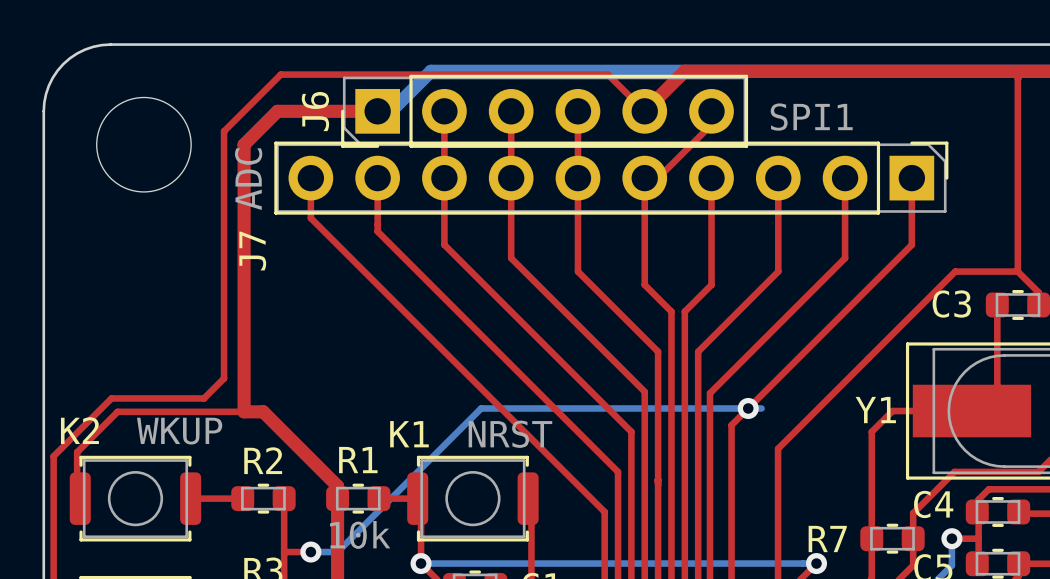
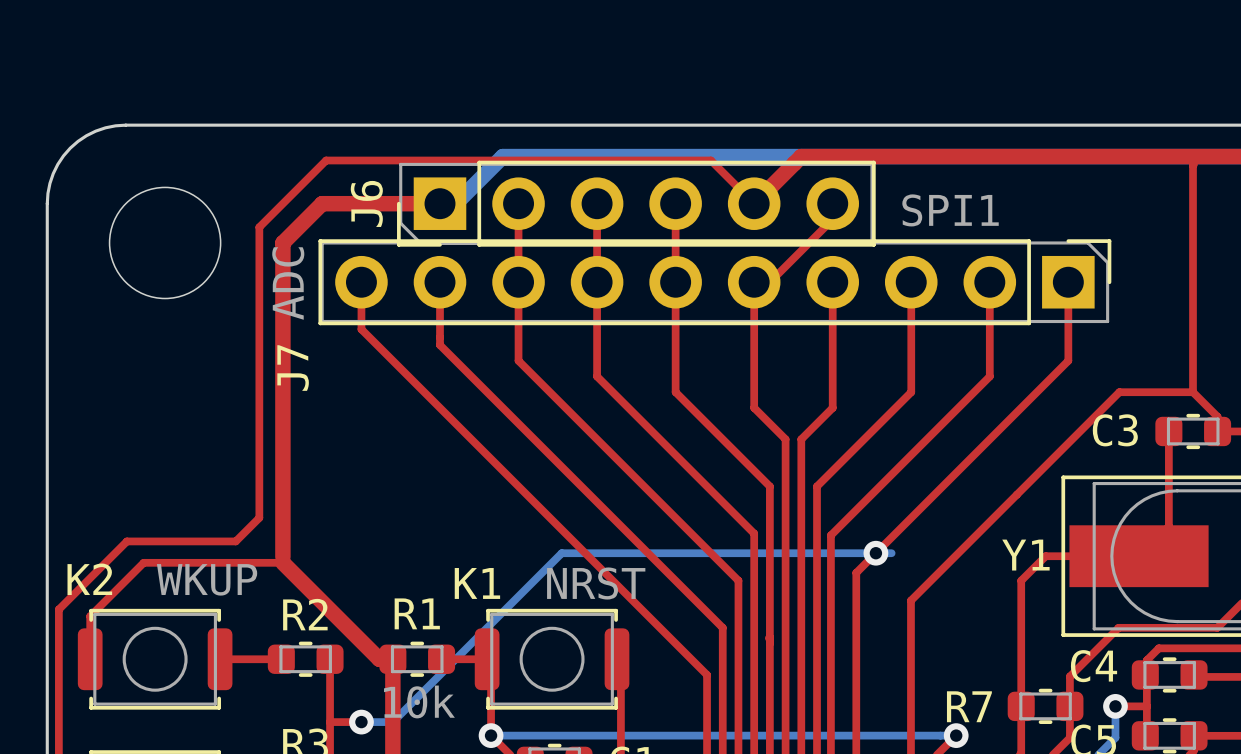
top track: (77, 478) (77, 452) (117, 411) (263, 411) (337, 486) (337, 498) -> (90, 659) (90, 616) (143, 562) (282, 562) (379, 659) (392, 659)

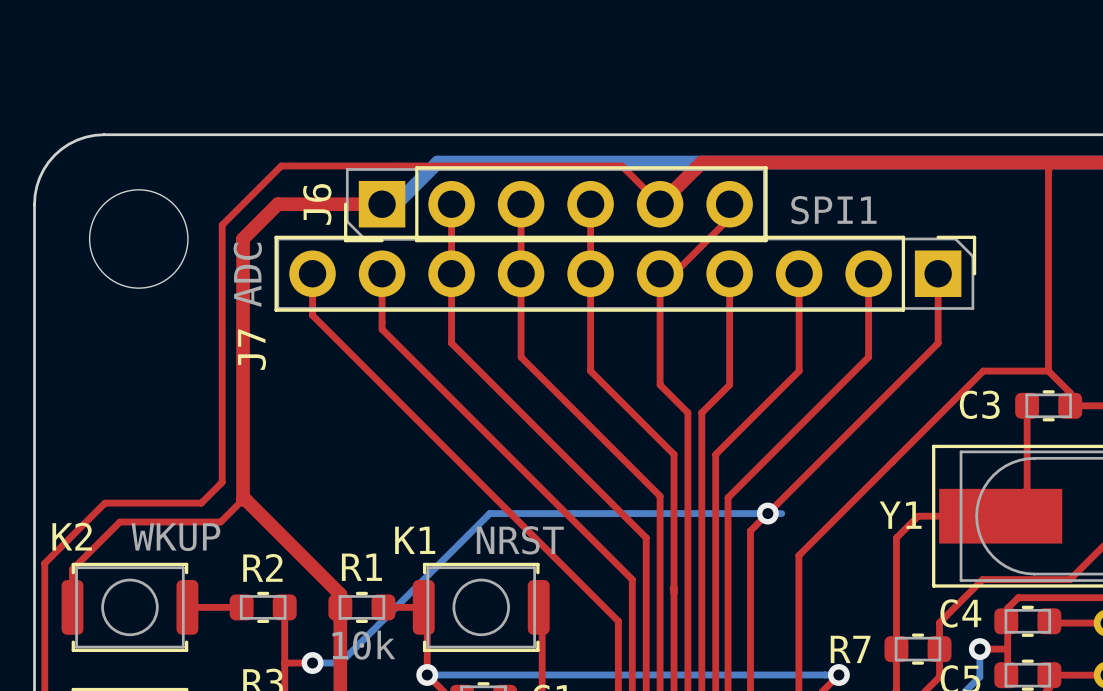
top track: (282, 537) (282, 557) -> none
top track: (257, 562) (282, 562) (379, 659) (392, 659) -> (220, 522) (243, 499) (245, 499) (340, 594) (340, 607)

